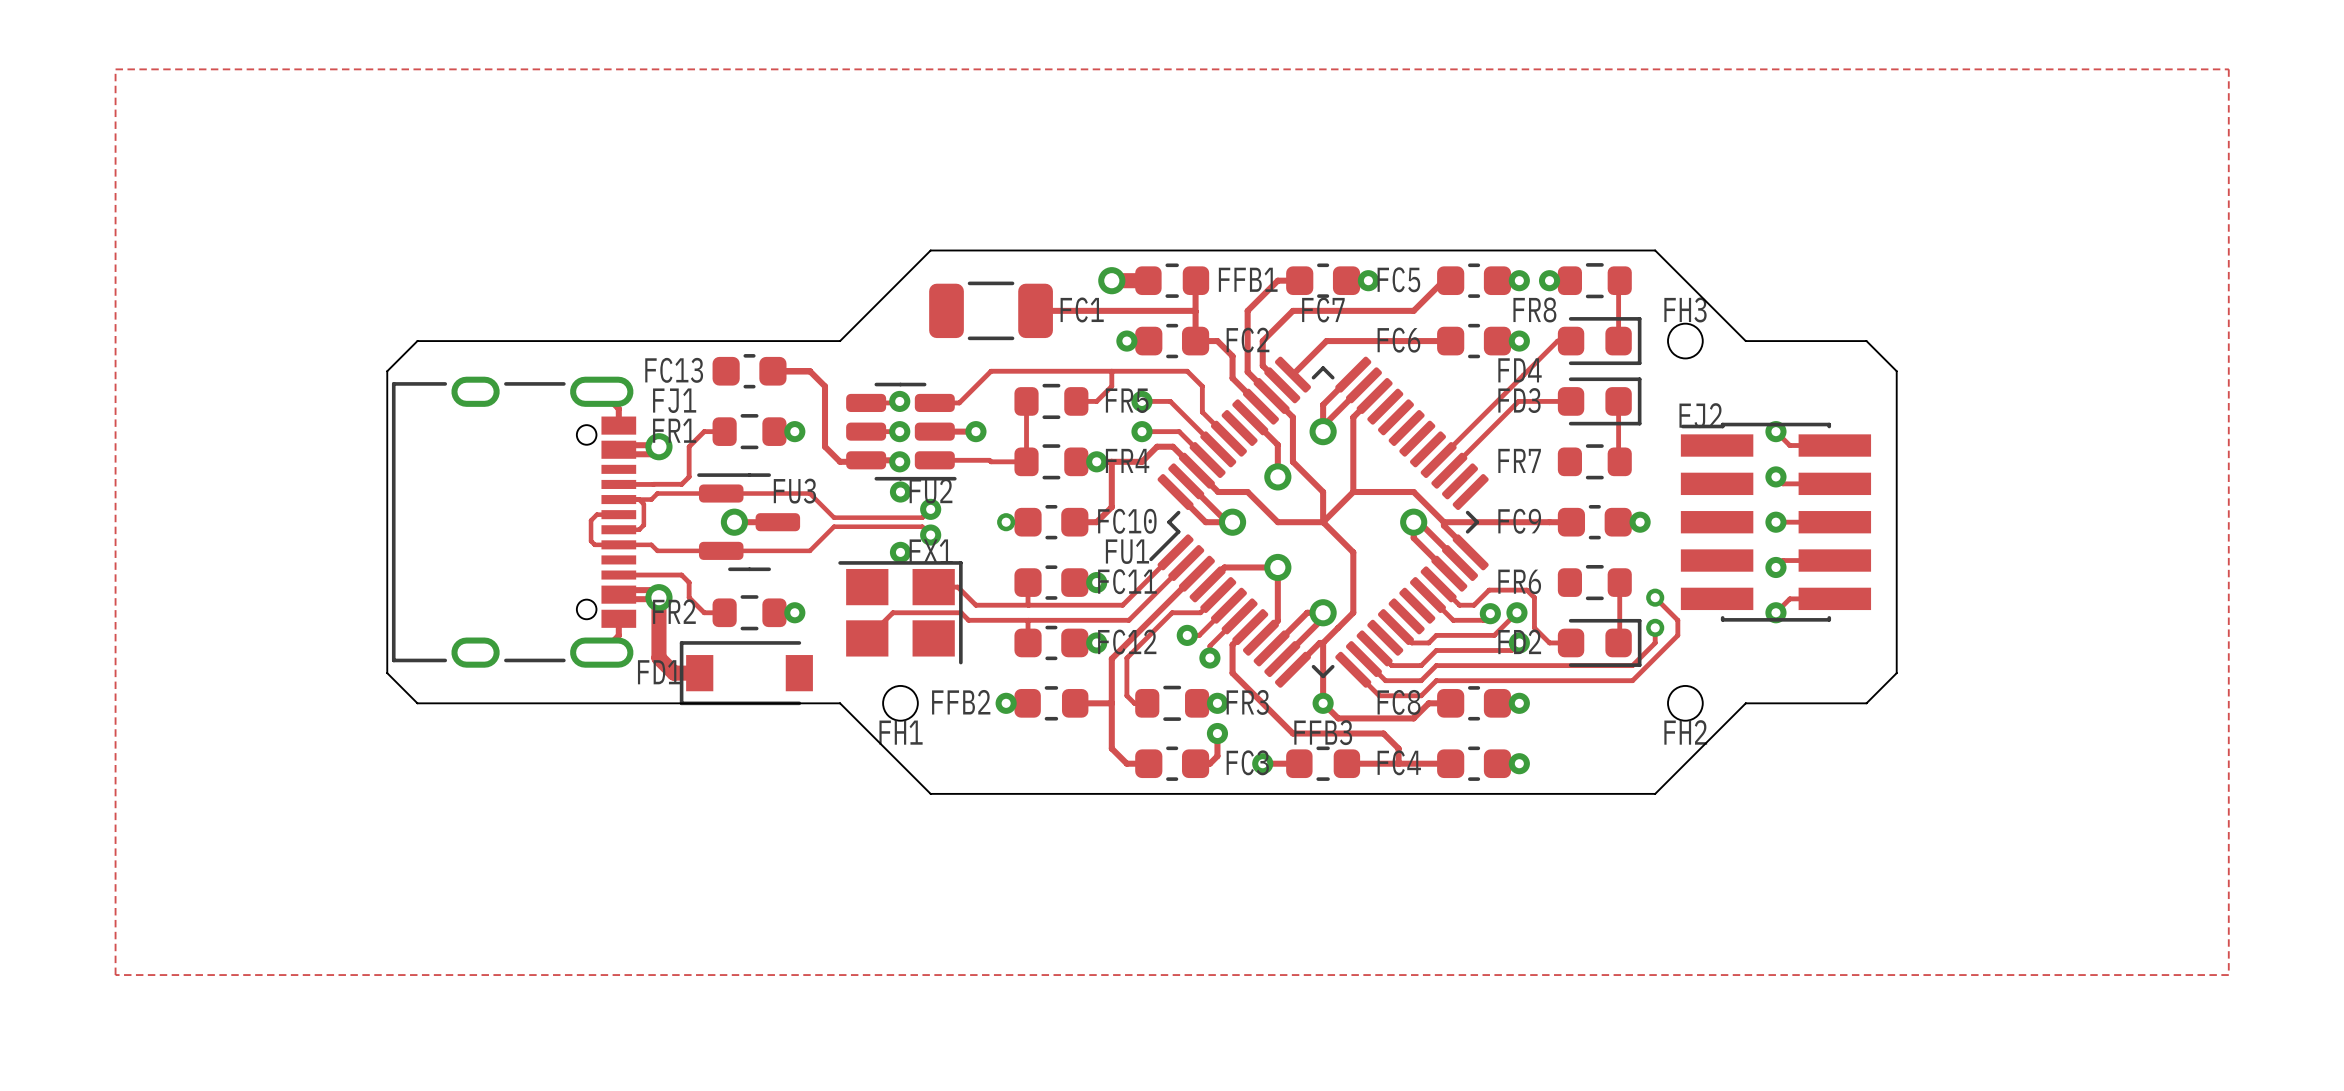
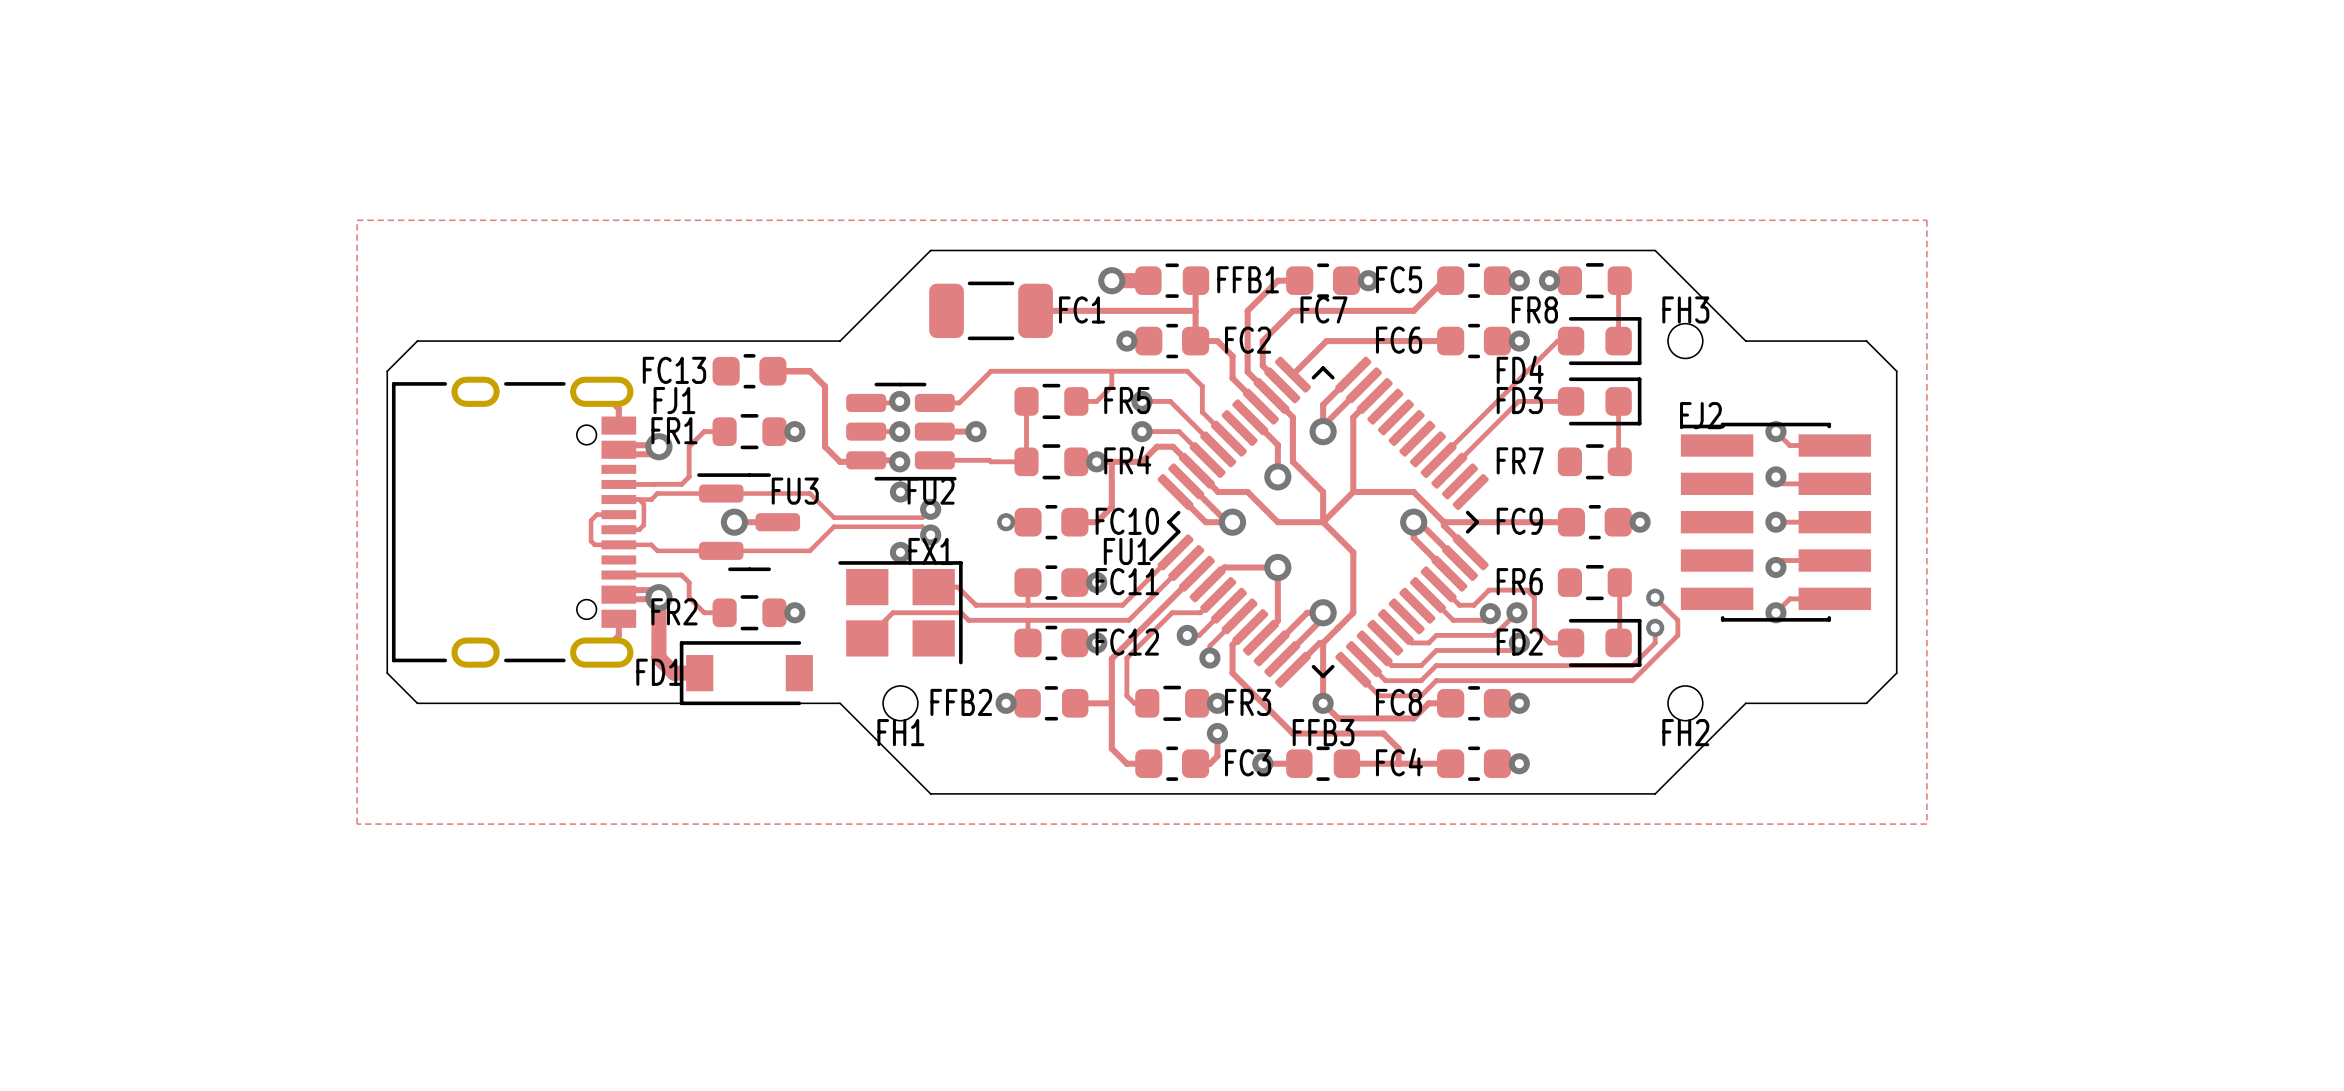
zone outline: (115, 69) (115, 975) (2228, 975) (2228, 69) (115, 69) -> none
zone outline: none -> (357, 220) (357, 824) (1926, 824) (1926, 220) (357, 220)

